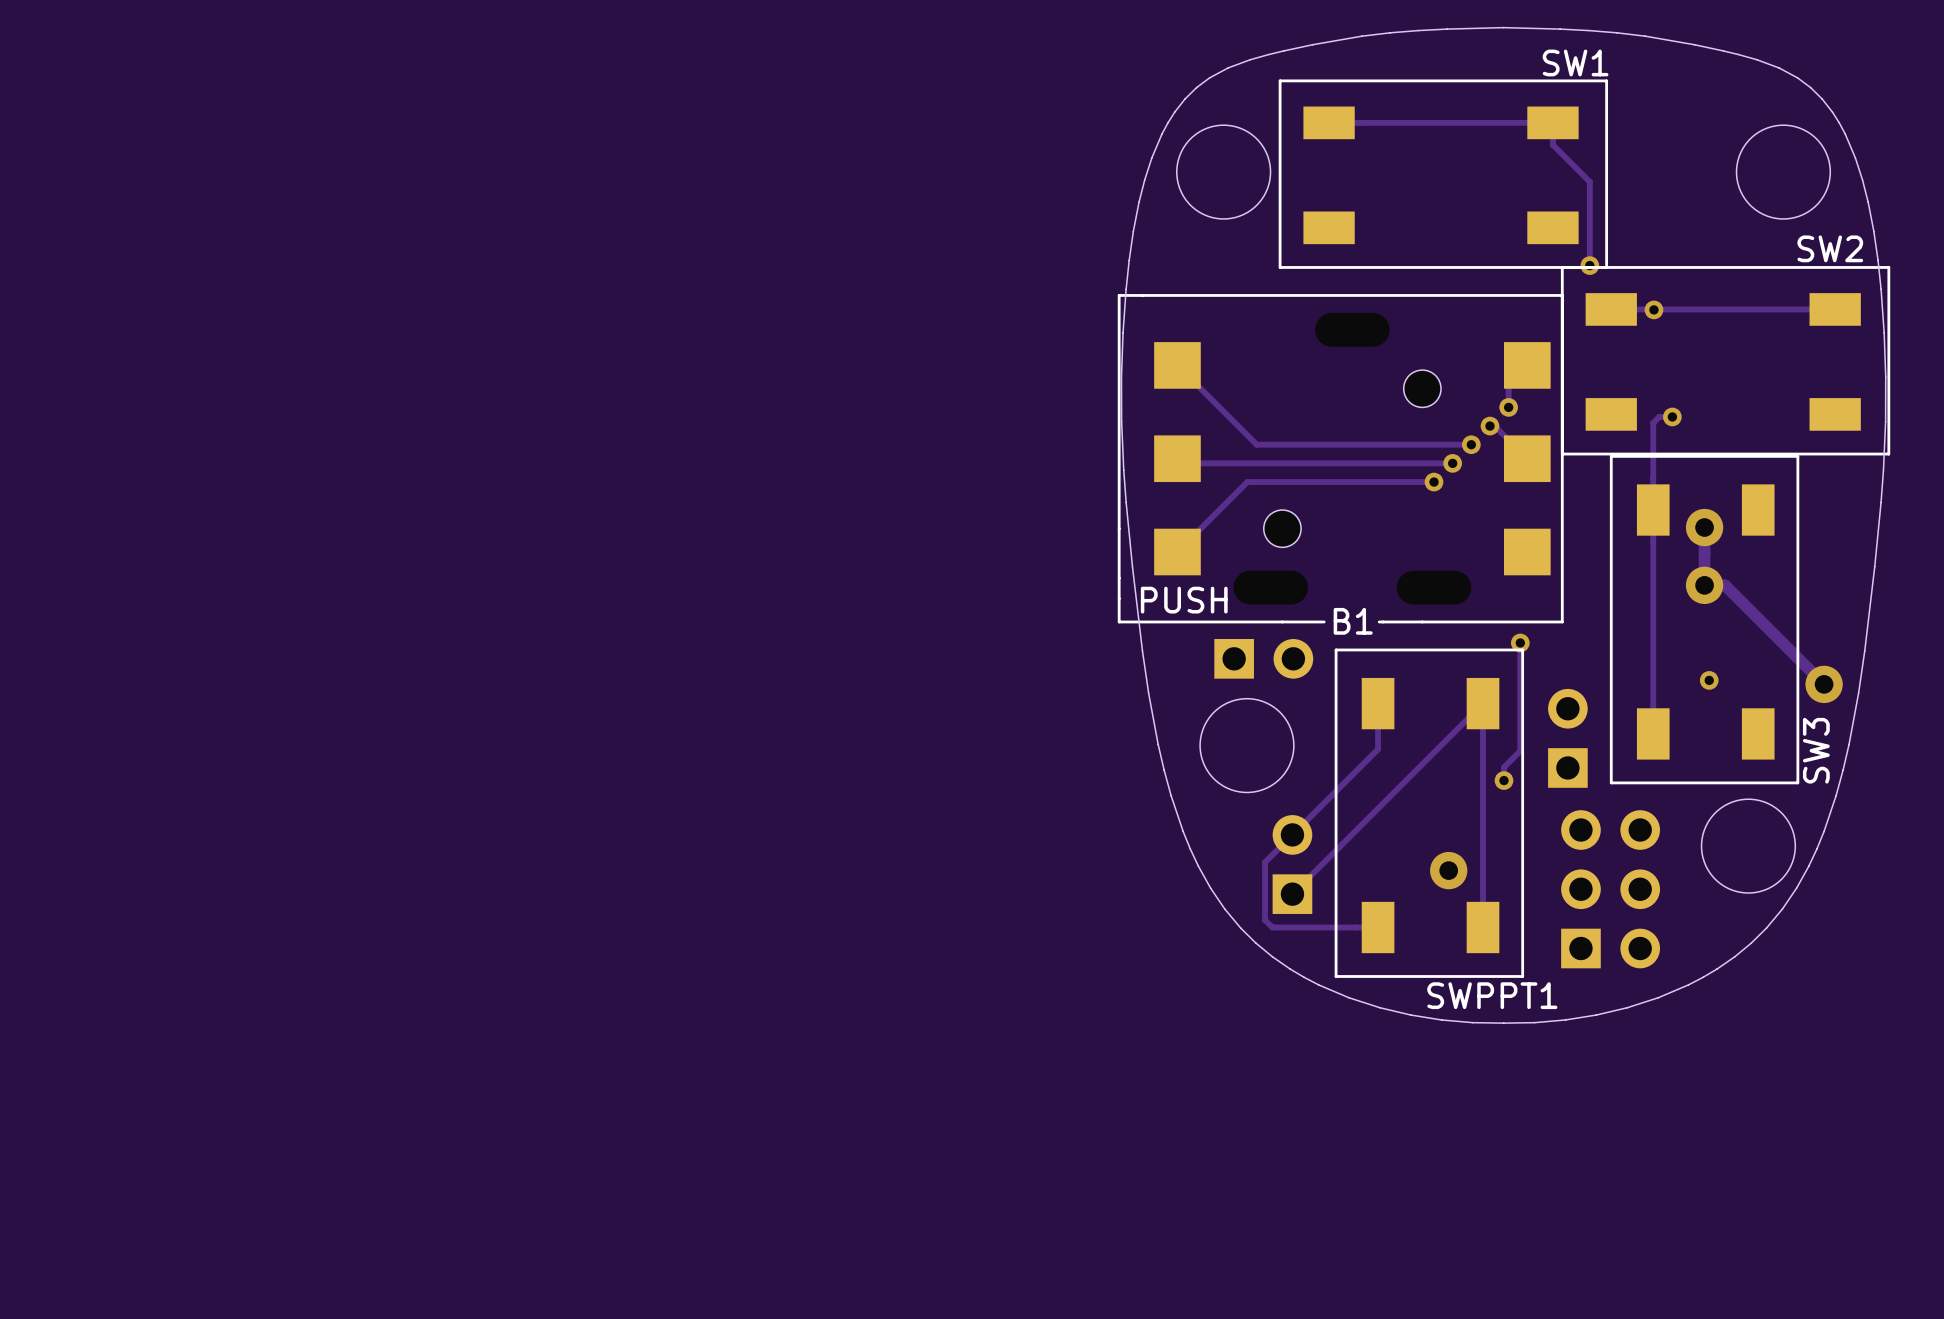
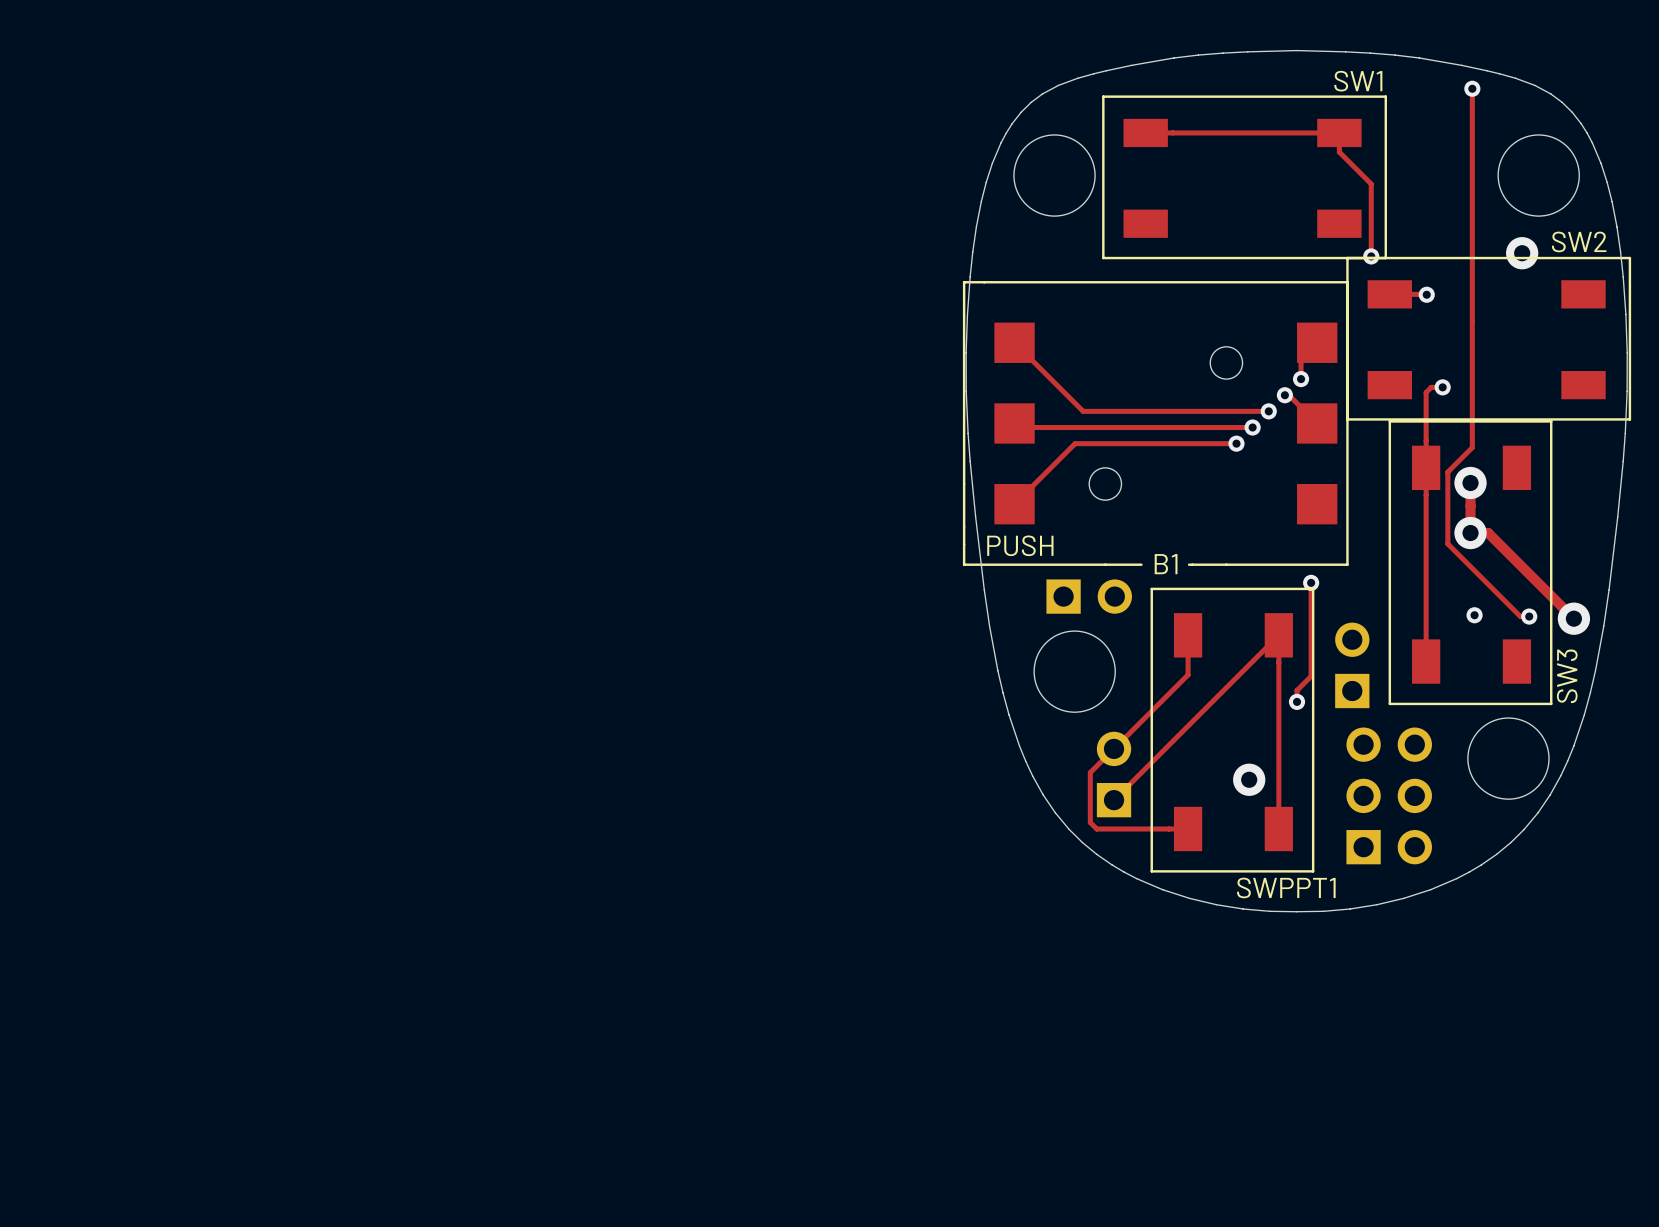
track: none -> (1472, 88) (1472, 447) (1447, 472) (1447, 543) (1520, 616) (1529, 616)
via: none -> (1472, 88)
via: none -> (1522, 253)
track: (1654, 309) (1835, 309) -> none
via: none -> (1529, 616)

